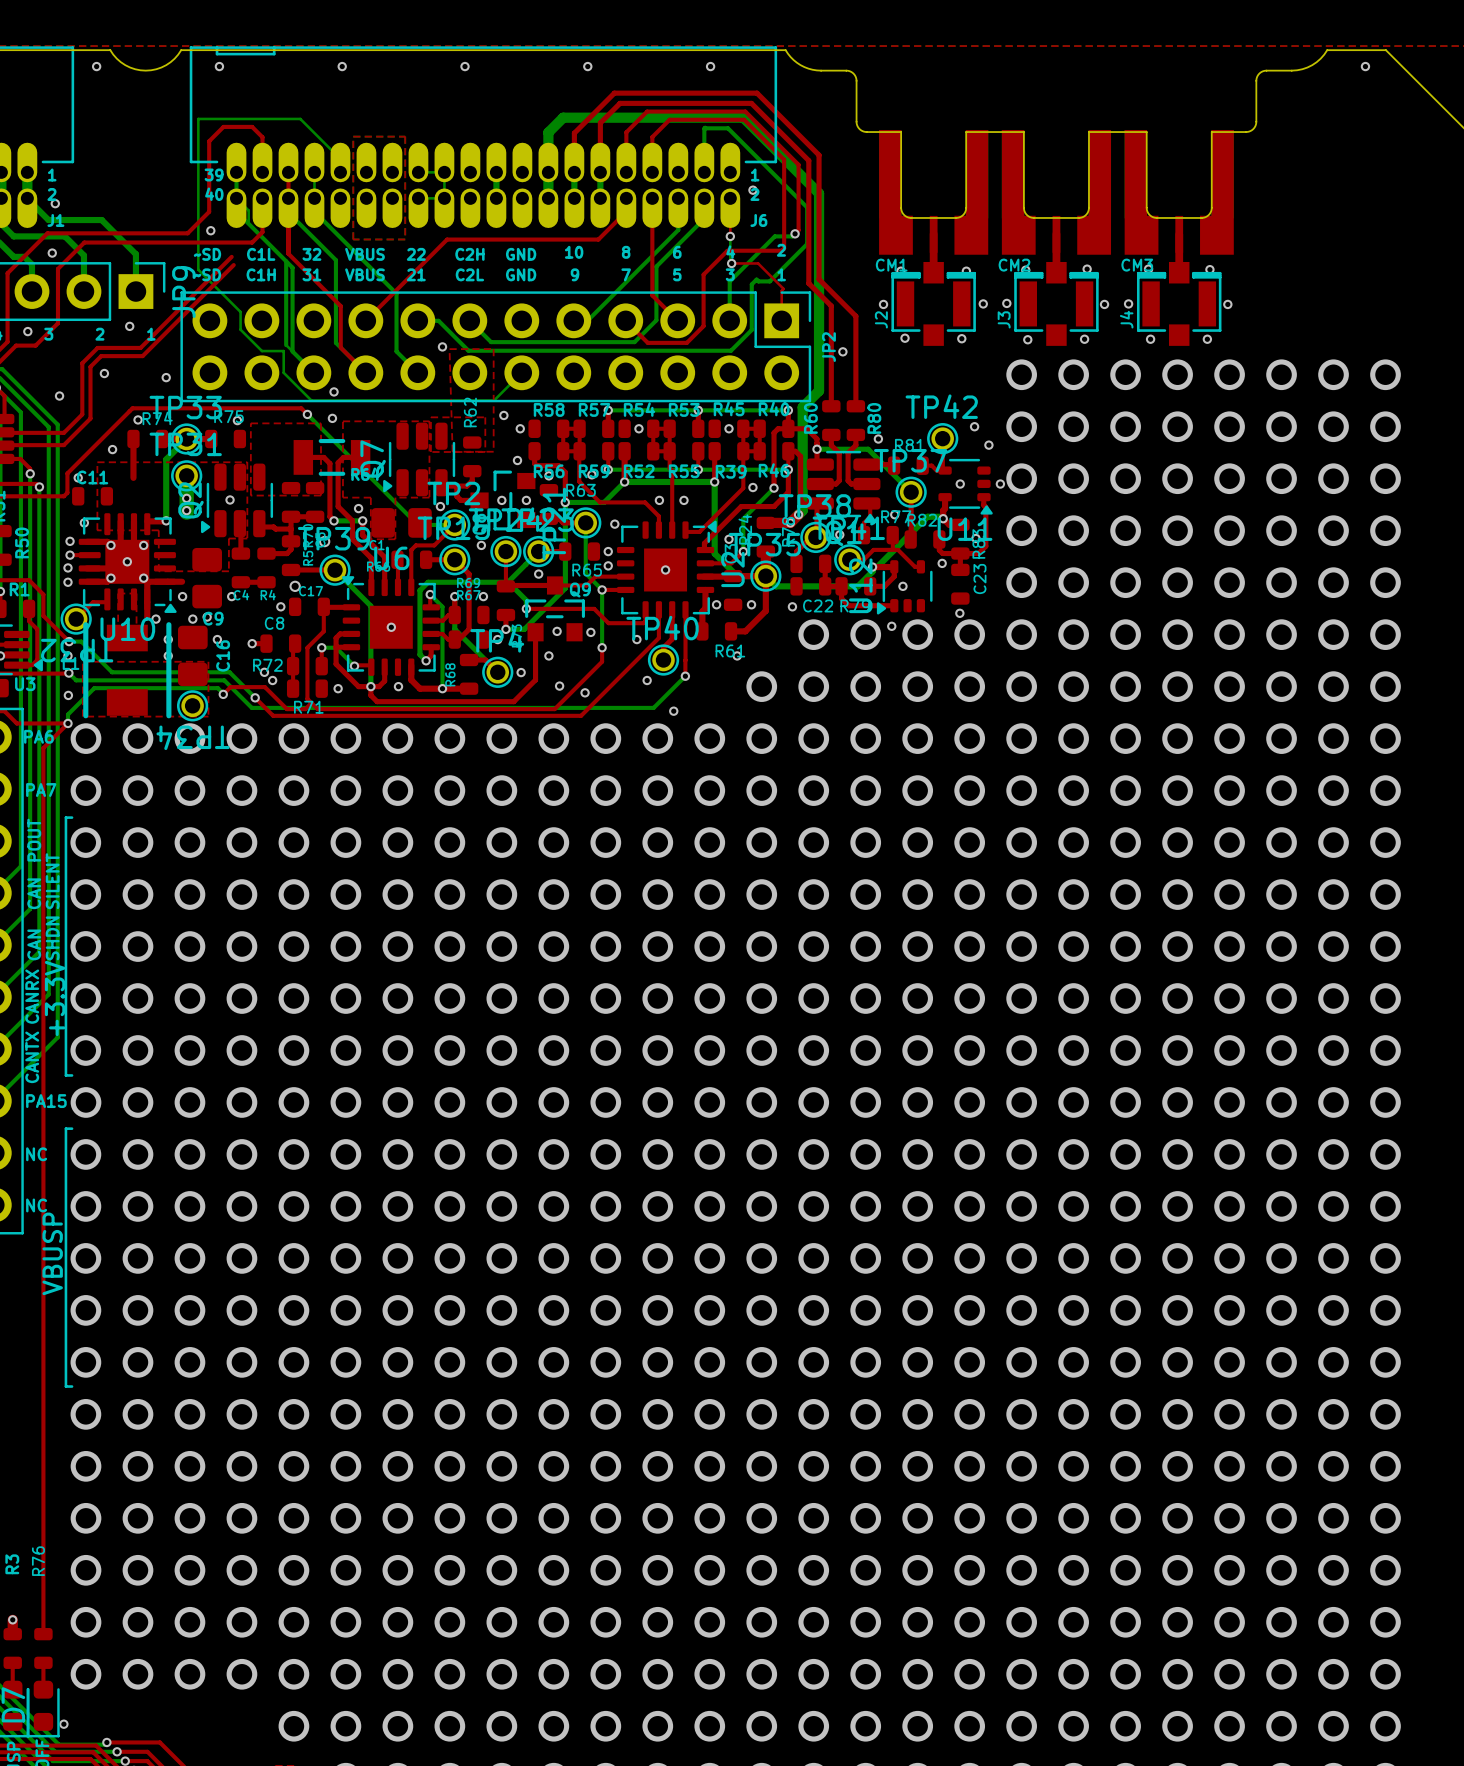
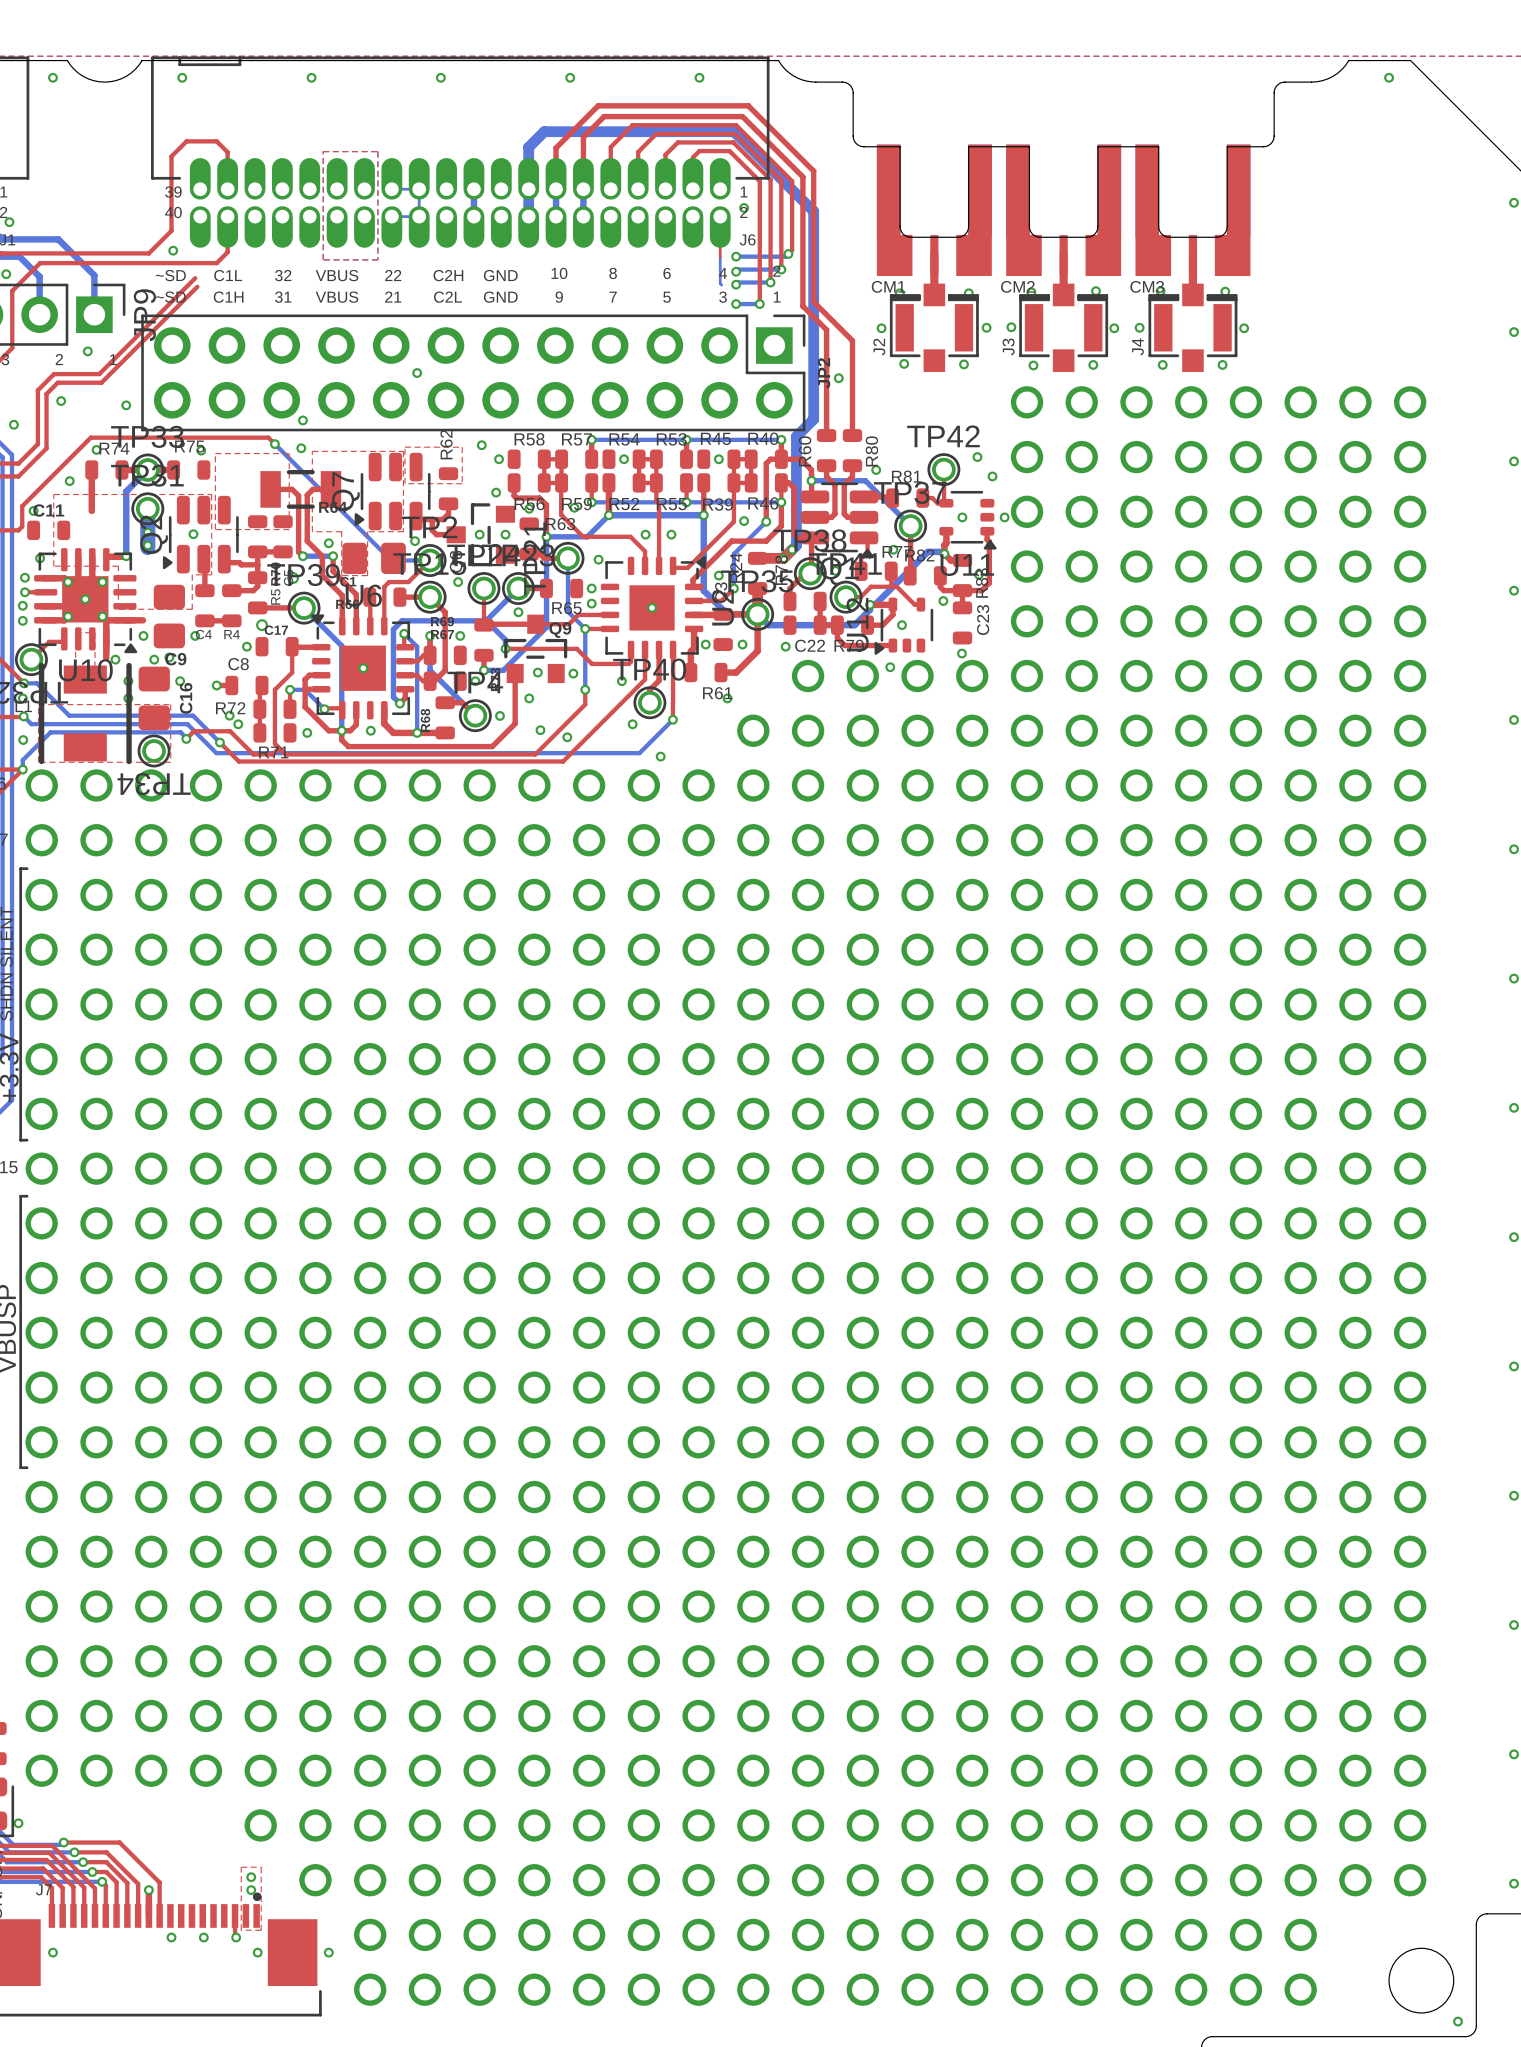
top track: (784, 159) (784, 248) (782, 250) (727, 250) (703, 274) (703, 326) (686, 342) (647, 342) (625, 320) -> (776, 176) (781, 180) (781, 269)
bottom track: (236, 172) (236, 211) (292, 267) (292, 351) (313, 372) (286, 345) (286, 261) (248, 223) (248, 210) (236, 198) (236, 172) -> none
top track: (288, 172) (288, 253) (340, 306) (340, 347) (365, 372) -> none
bottom track: (288, 172) (288, 212) (335, 260) (335, 342) (365, 372) -> none
bottom track: (314, 172) (314, 211) (396, 293) (396, 351) (417, 372) -> none
bottom track: (340, 172) (340, 159) (300, 118) (198, 118) (198, 269) (240, 311) (240, 329) (262, 351) (283, 351) (283, 372) (311, 400) (494, 400) (521, 372) -> none
top track: none -> (665, 189) (665, 154) (677, 142) (733, 142) (770, 179) (770, 282)
top track: none -> (692, 189) (692, 157) (699, 151) (729, 151) (759, 181) (759, 304)
bottom track: (704, 172) (704, 128) (728, 128) (807, 207) (807, 244) (767, 281) -> none
top track: (626, 198) (626, 211) (598, 239) (447, 239) (365, 320) -> none
top track: (652, 198) (652, 295) (677, 320) -> none
bottom track: (678, 198) (678, 229) (587, 320) (573, 320) -> none
bottom track: (704, 198) (704, 218) (656, 266) (656, 320) (634, 342) (491, 342) (469, 320) -> none
via: (730, 236) -> none
via: none -> (736, 256)
bottom track: (774, 236) (729, 281) (729, 320) -> (767, 256) (736, 256)
bottom track: none -> (781, 269) (738, 269) (736, 271)
via: none -> (781, 269)
via: none -> (736, 271)
bottom track: none -> (770, 282) (738, 282) (736, 284)
via: none -> (770, 282)
top track: (731, 263) (758, 263) (783, 288) (781, 290) (781, 320) -> none
via: (731, 263) -> none
via: none -> (736, 284)
via: none -> (736, 304)
bottom track: (758, 281) (756, 279) (751, 284) (751, 329) (731, 350) (468, 350) (438, 320) (417, 320) -> (749, 304) (736, 304)
via: none -> (759, 304)
top zone outline: (449, 349) (452, 451) (493, 451) (493, 349) (449, 349) -> none

